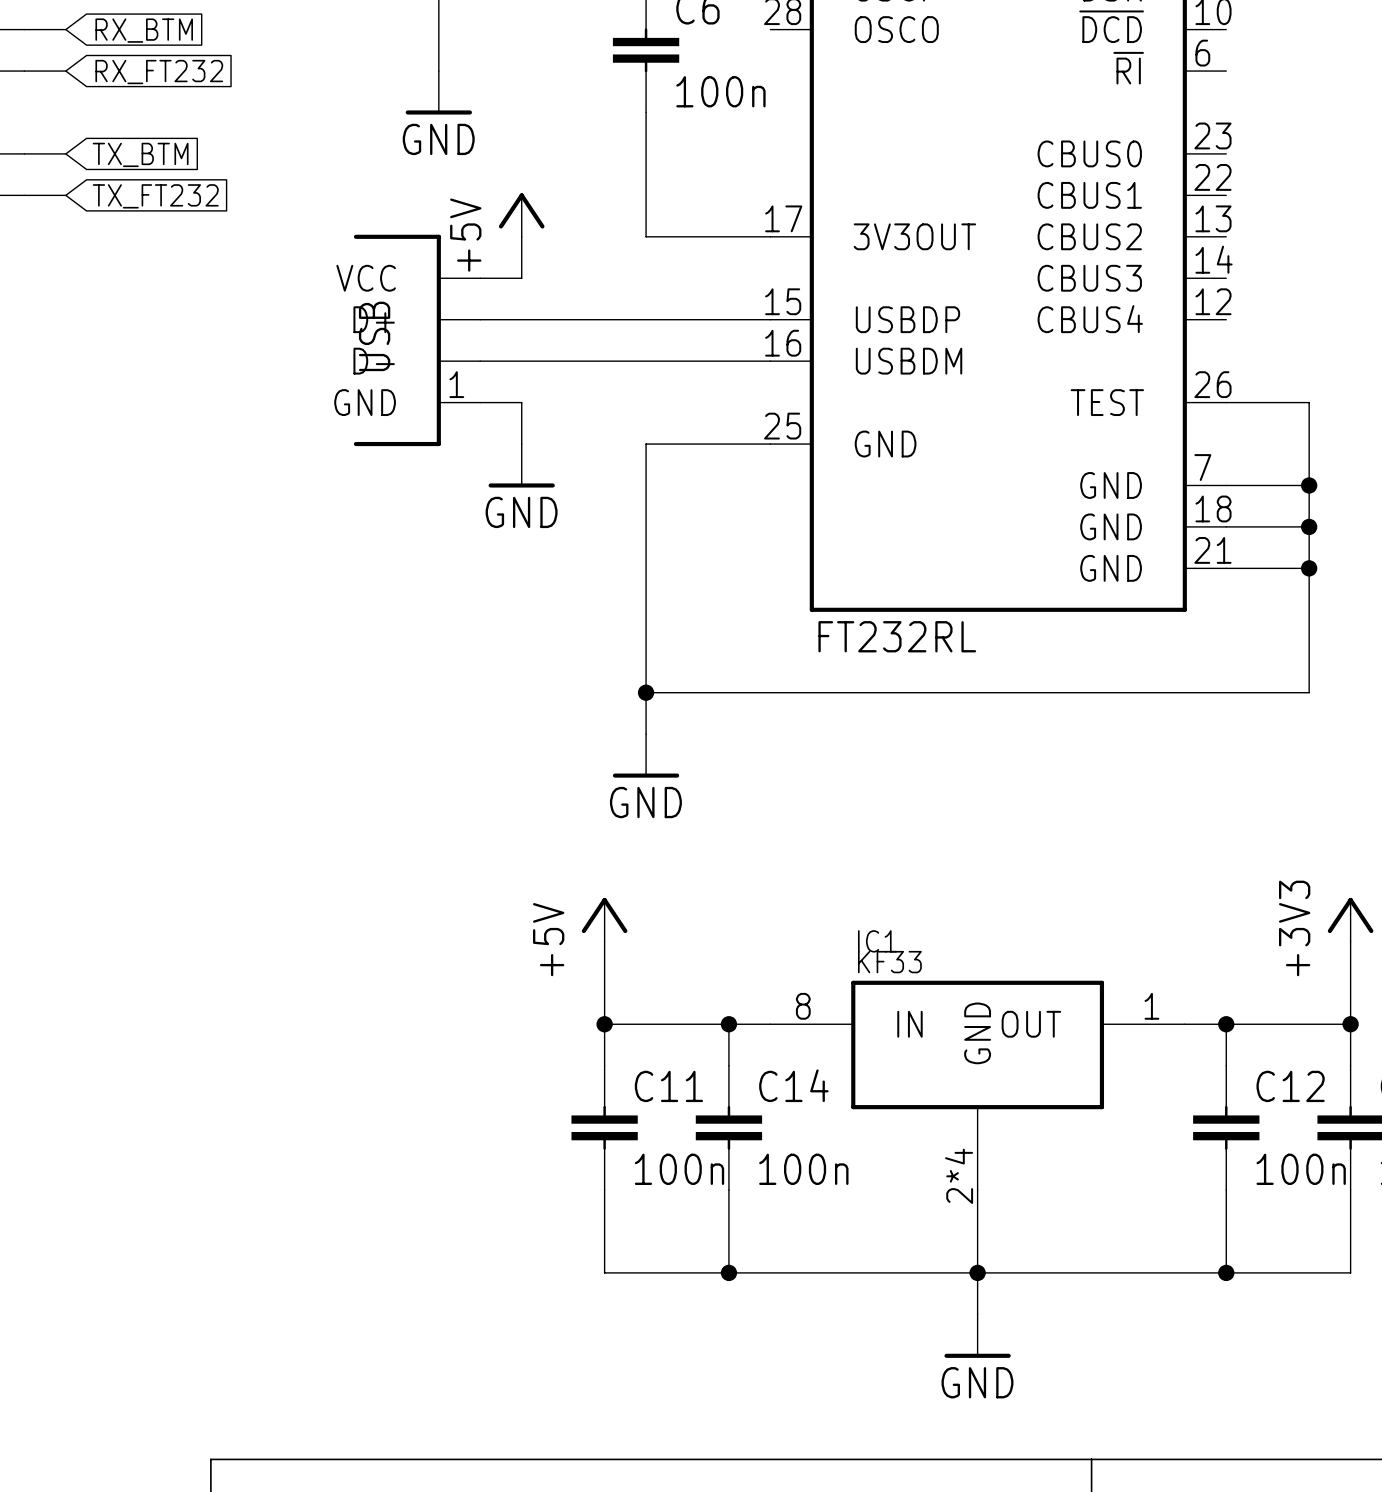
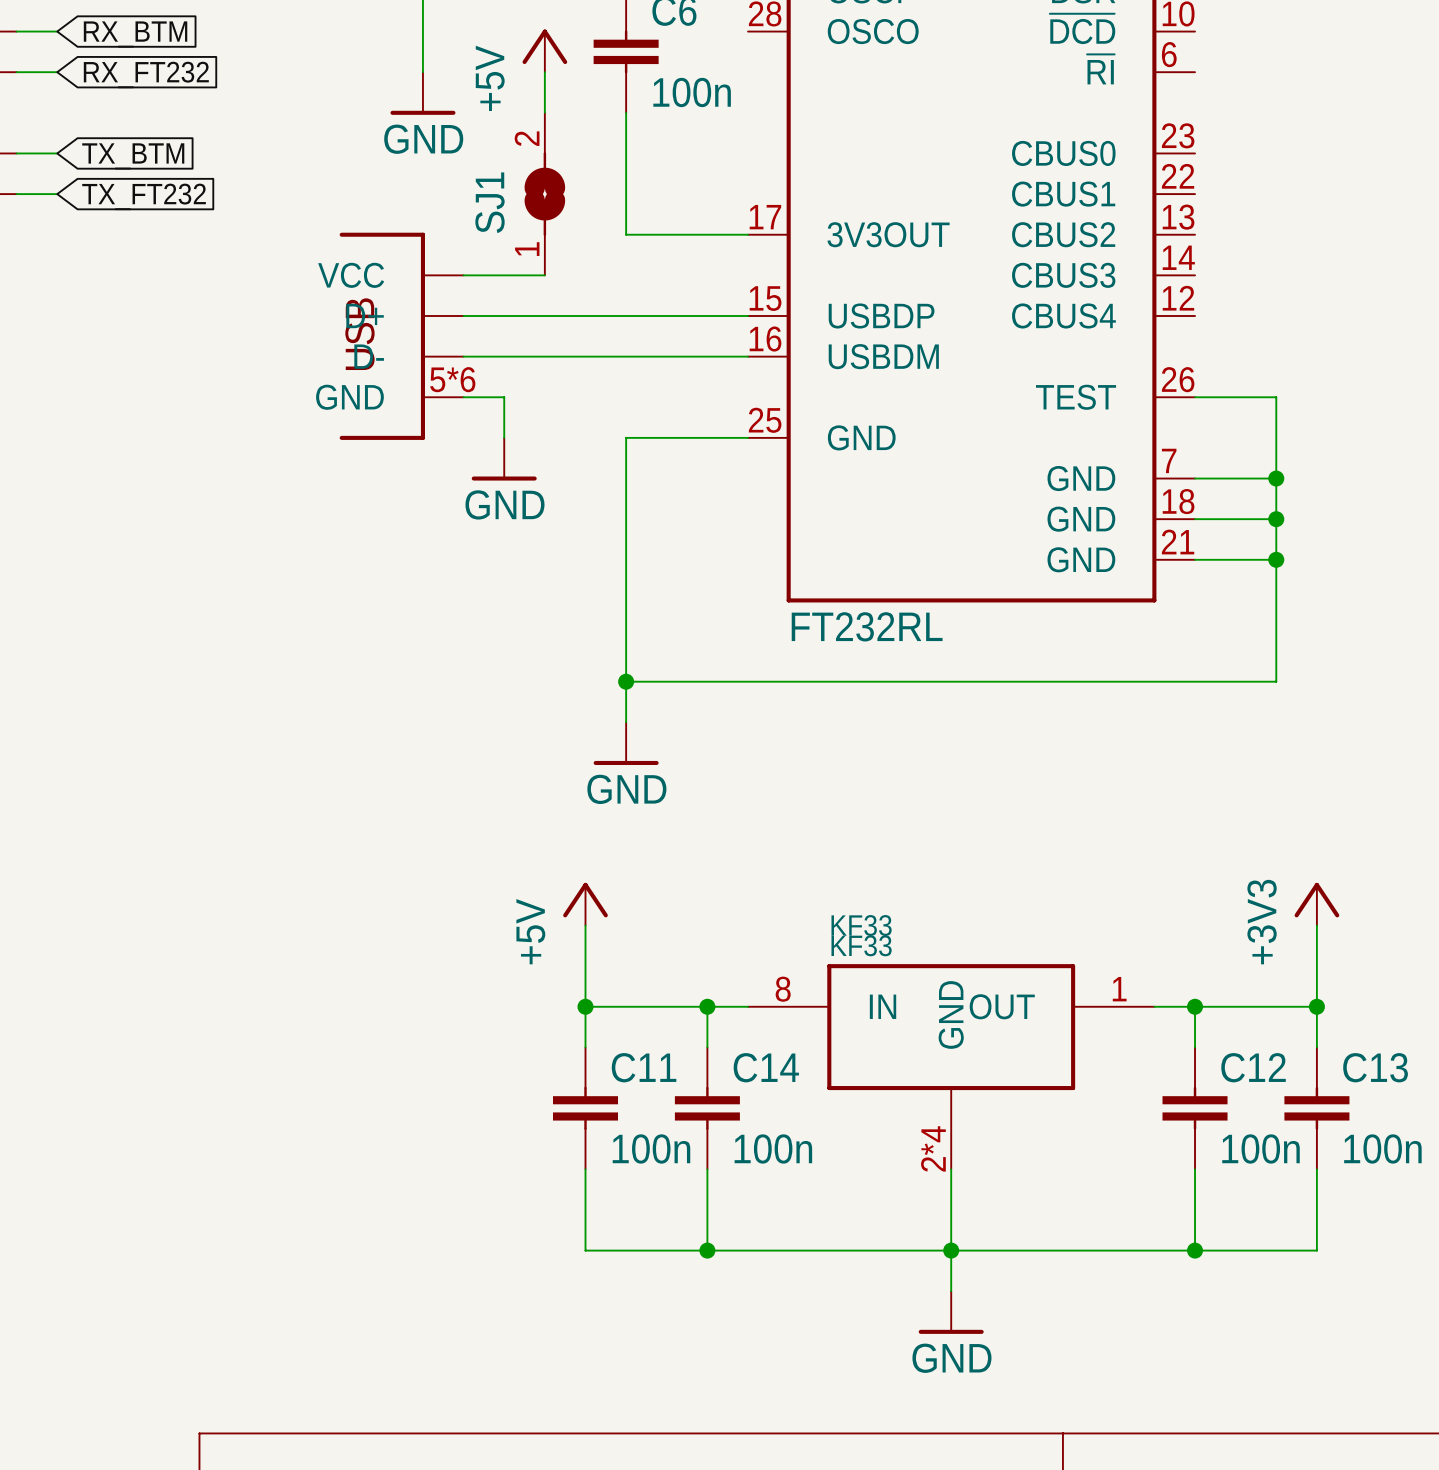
wire: none -> (544, 72) (544, 112)
SJ1: none -> (544, 194)
power symbol position: +5V (521, 215) -> +5V (544, 50)
wire: (521, 236) (521, 278) -> (544, 275) (504, 275)
part pin number: 1 (456, 384) -> 5*6 (452, 379)
IC1 name: IC1 (877, 941) -> KF33 (861, 925)

